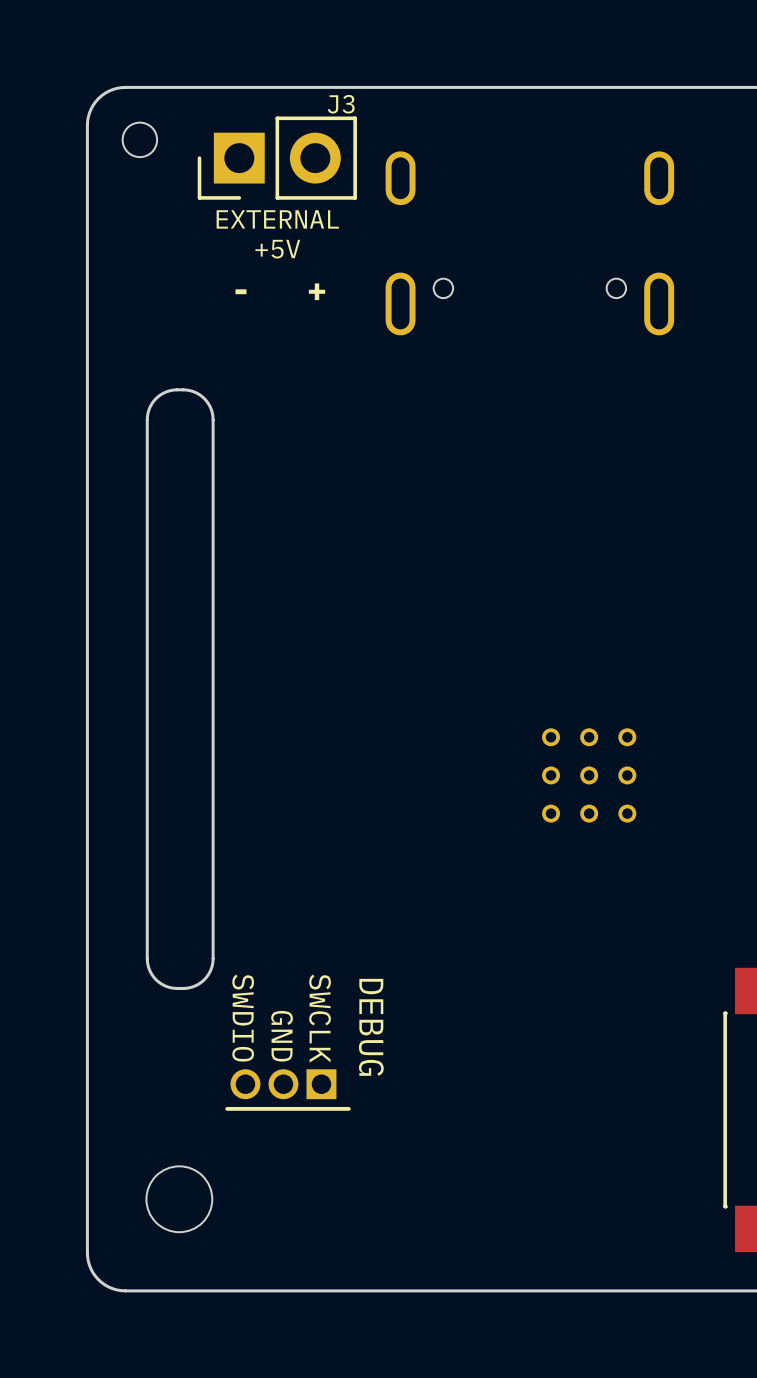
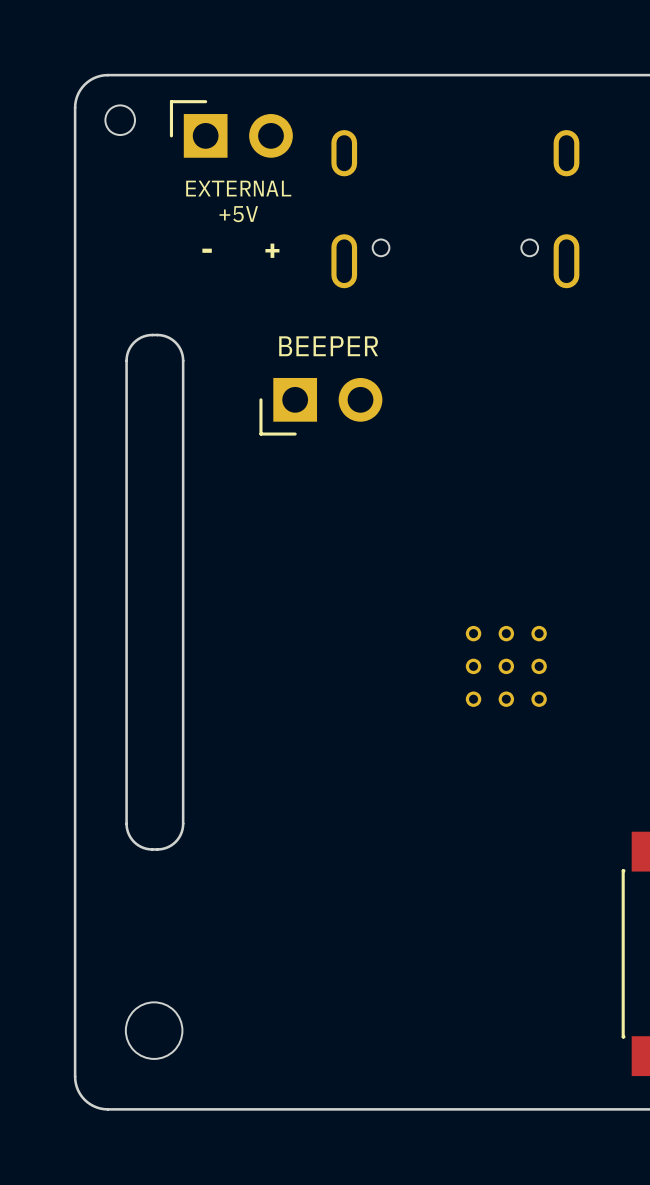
part: none -> (231, 128)
J3: (277, 158) -> none
text: none -> BEEPER (328, 346)
part: none -> (320, 406)
text: SWDIO (243, 1018) -> none
text: SWCLK (320, 1018) -> none
text: DEBUG (371, 1027) -> none
text: GND (282, 1036) -> none
part: (283, 1084) -> none
line: (227, 1108) (348, 1108) -> none

